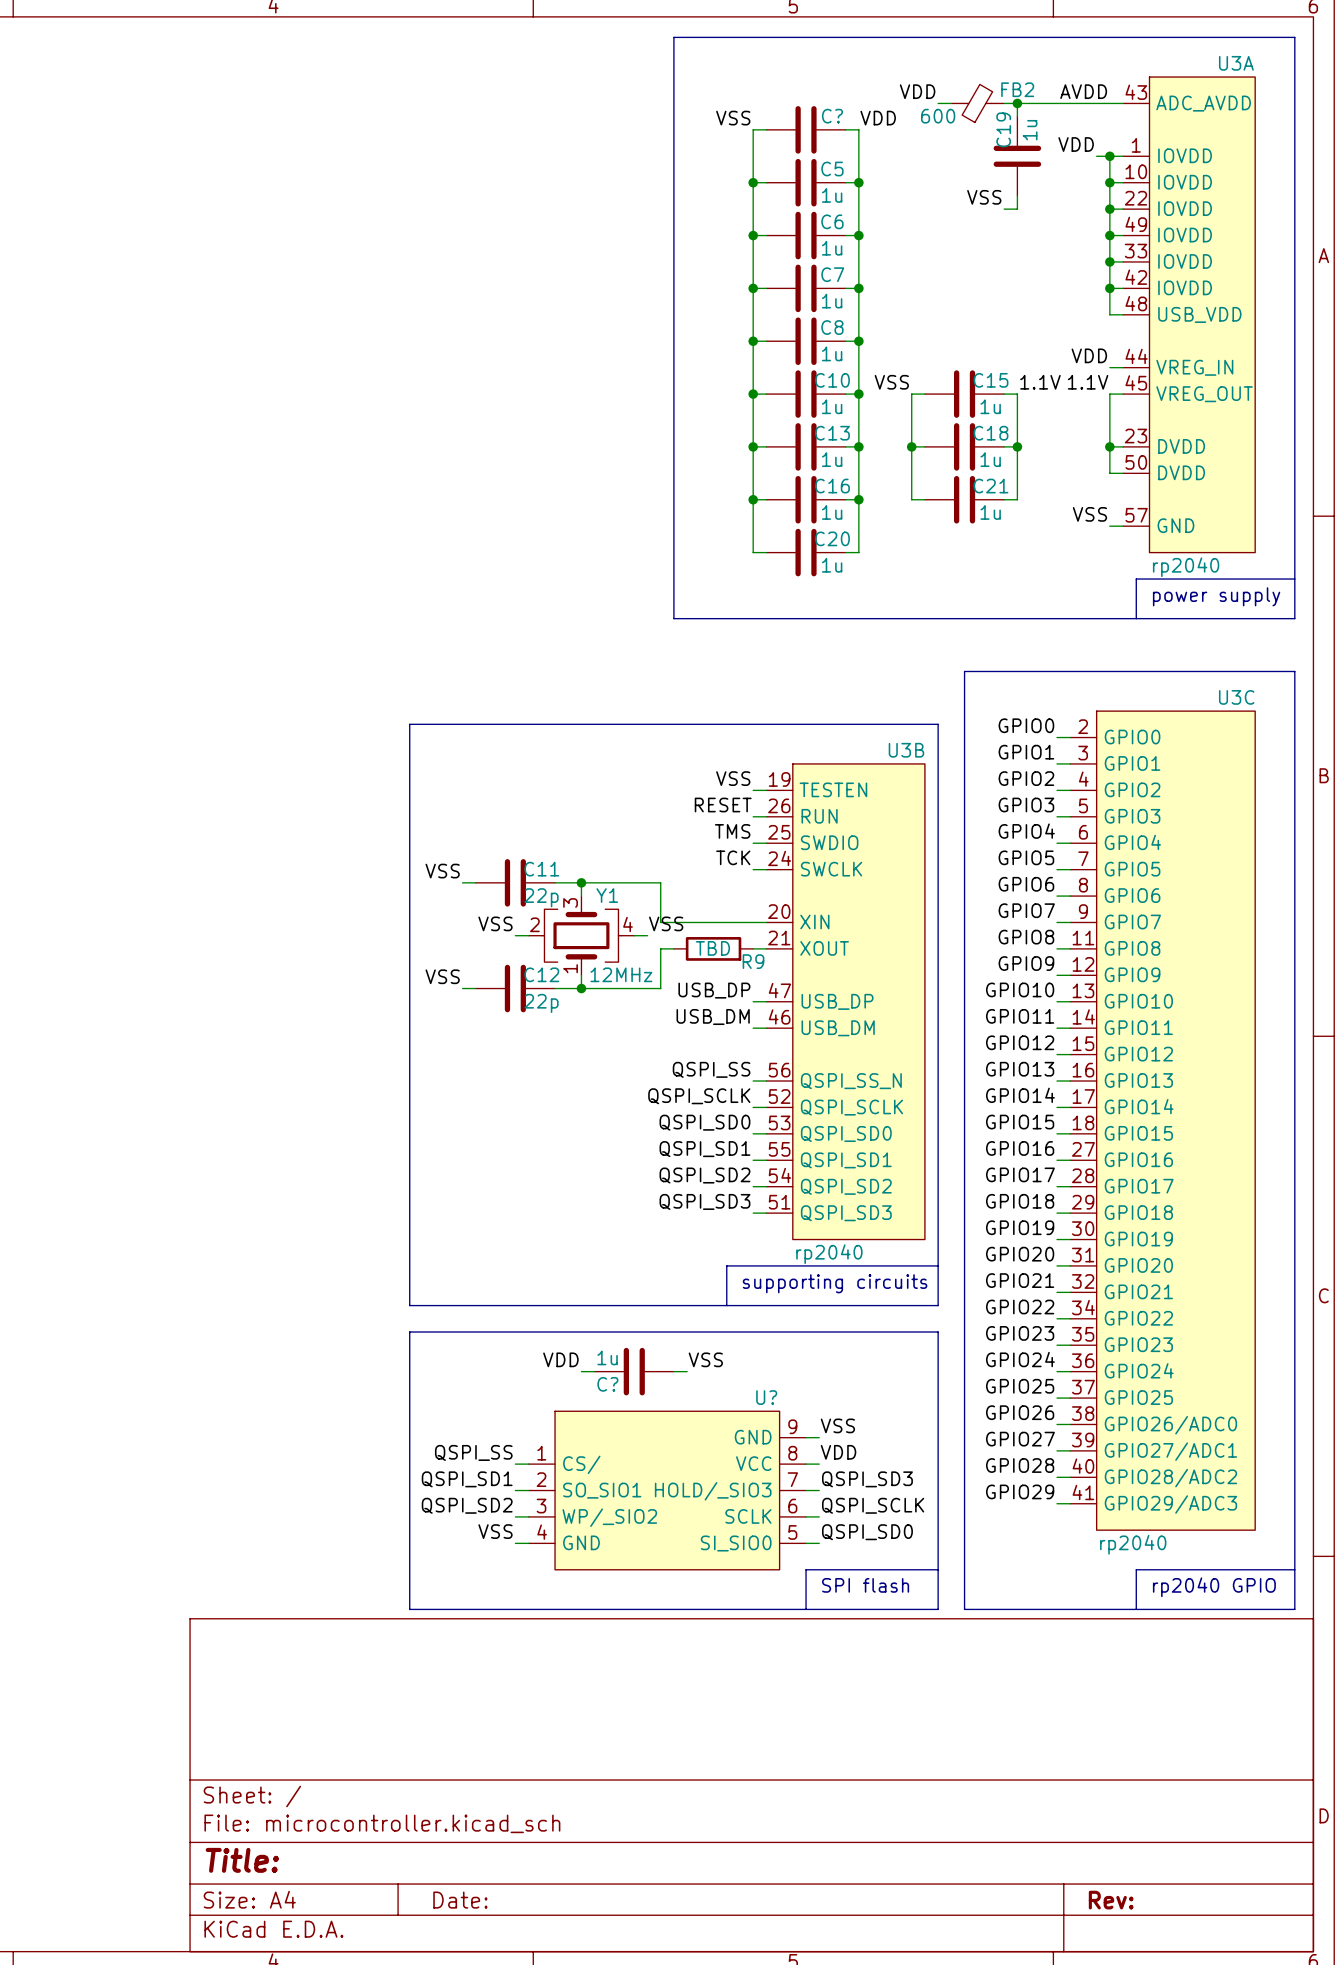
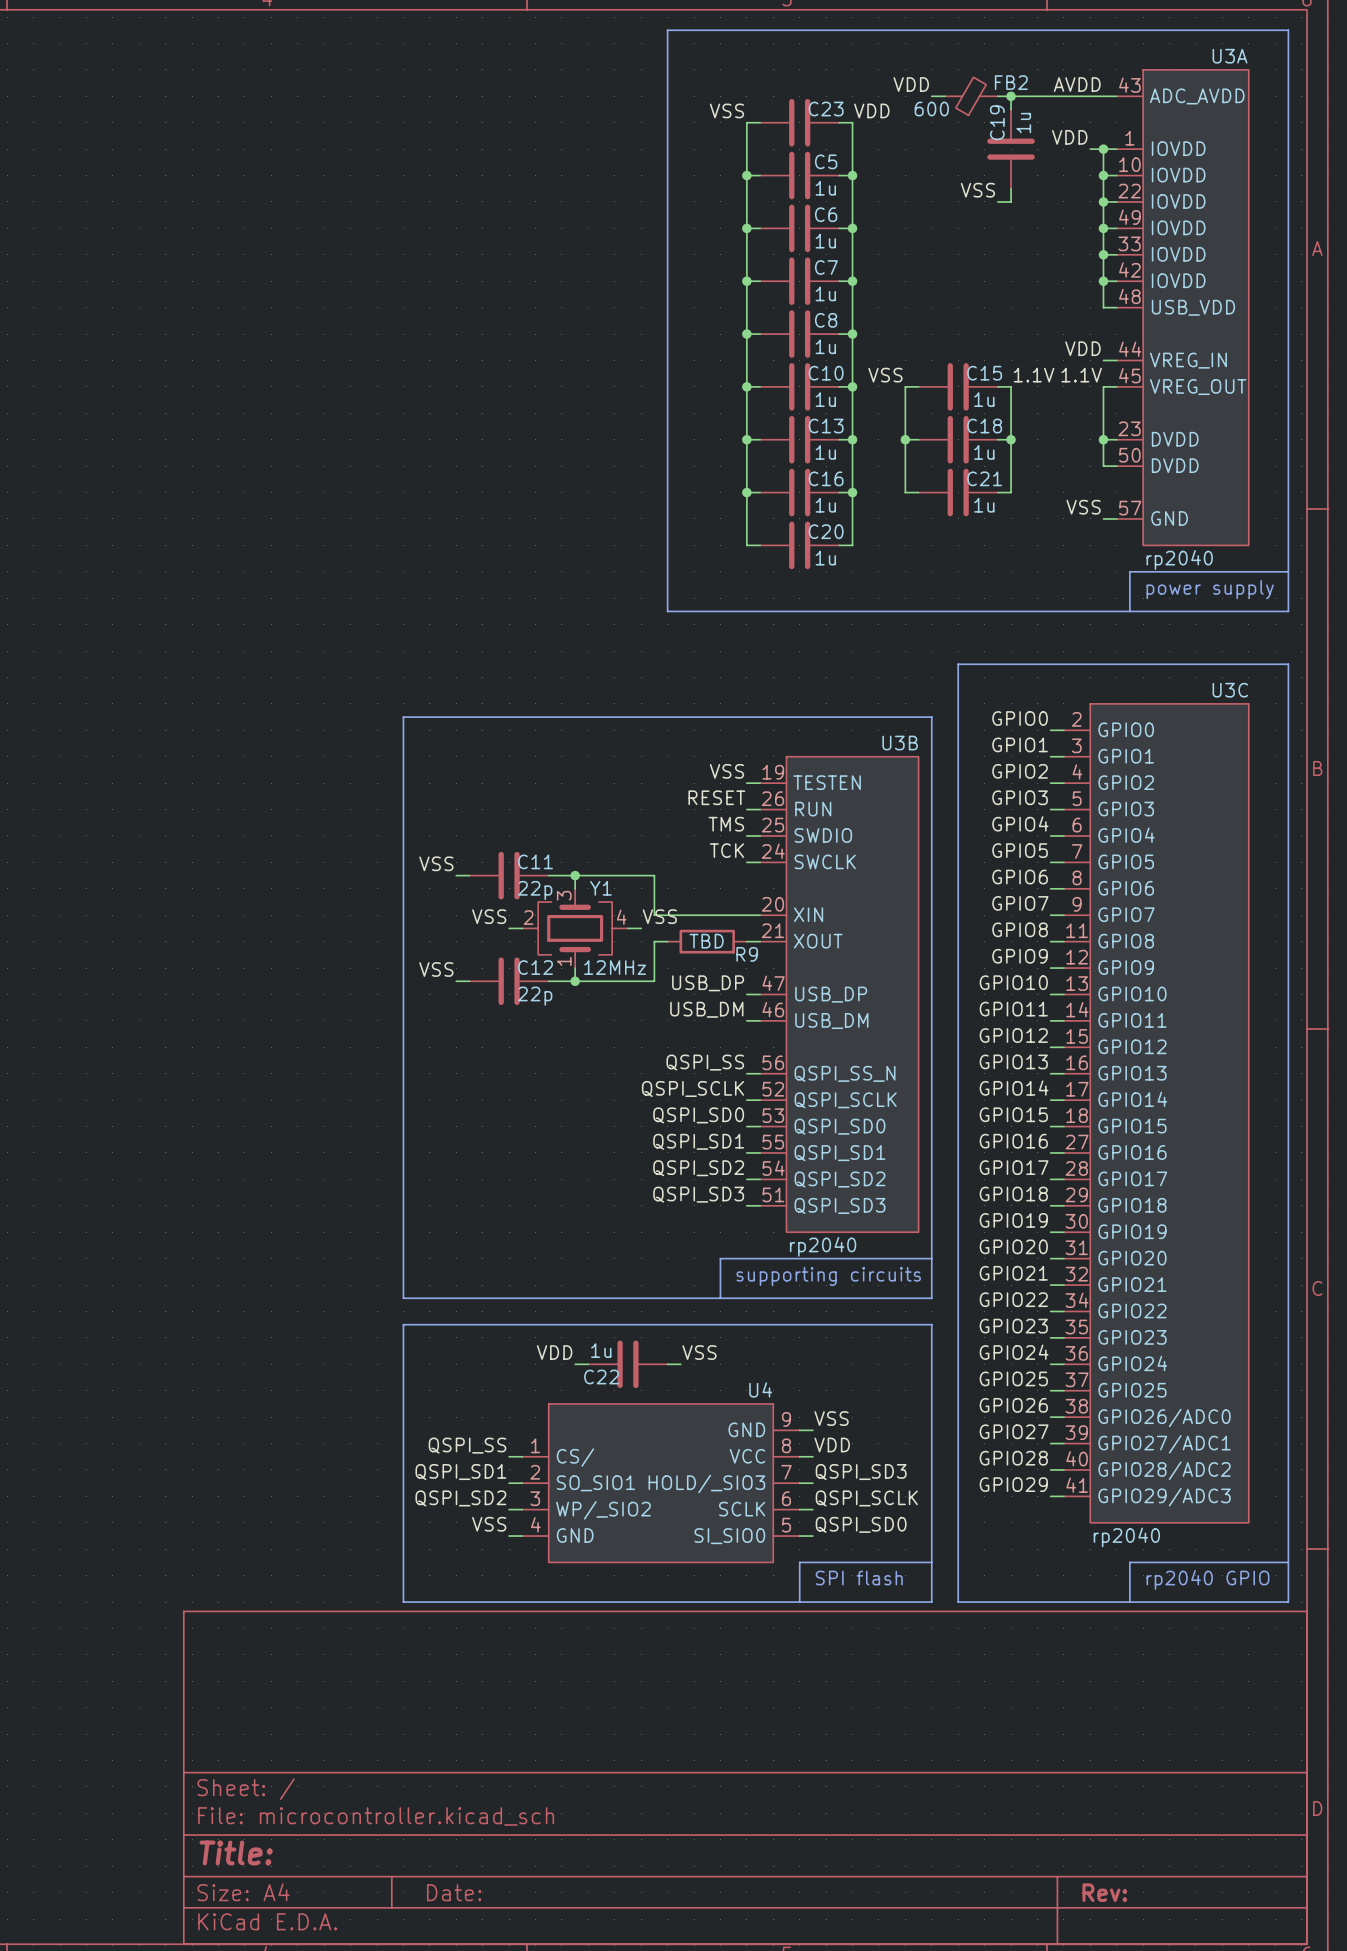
C? name: C? (832, 116) -> C23 (826, 109)
C? name: C? (607, 1384) -> C22 (601, 1377)
U? name: U? (766, 1397) -> U4 (760, 1389)

